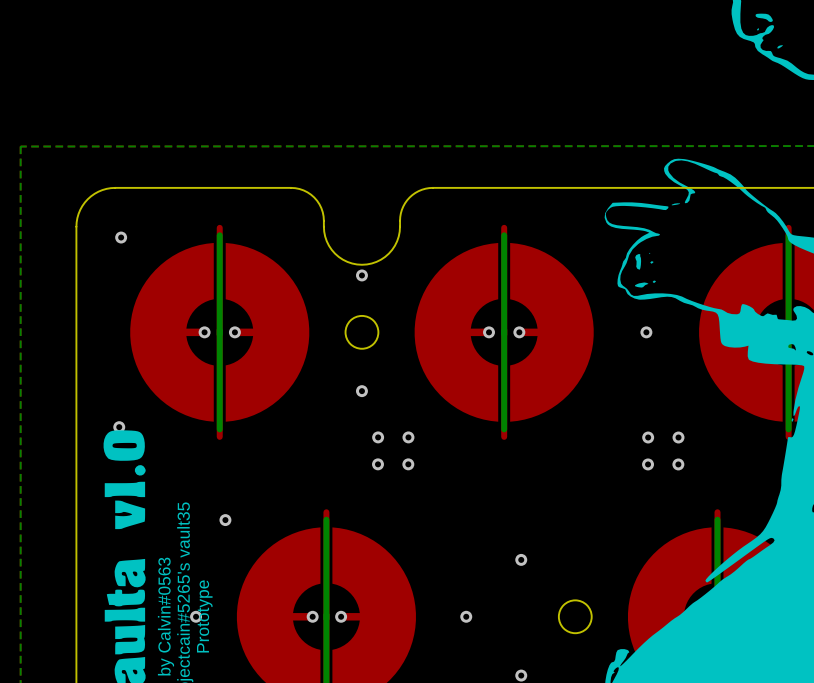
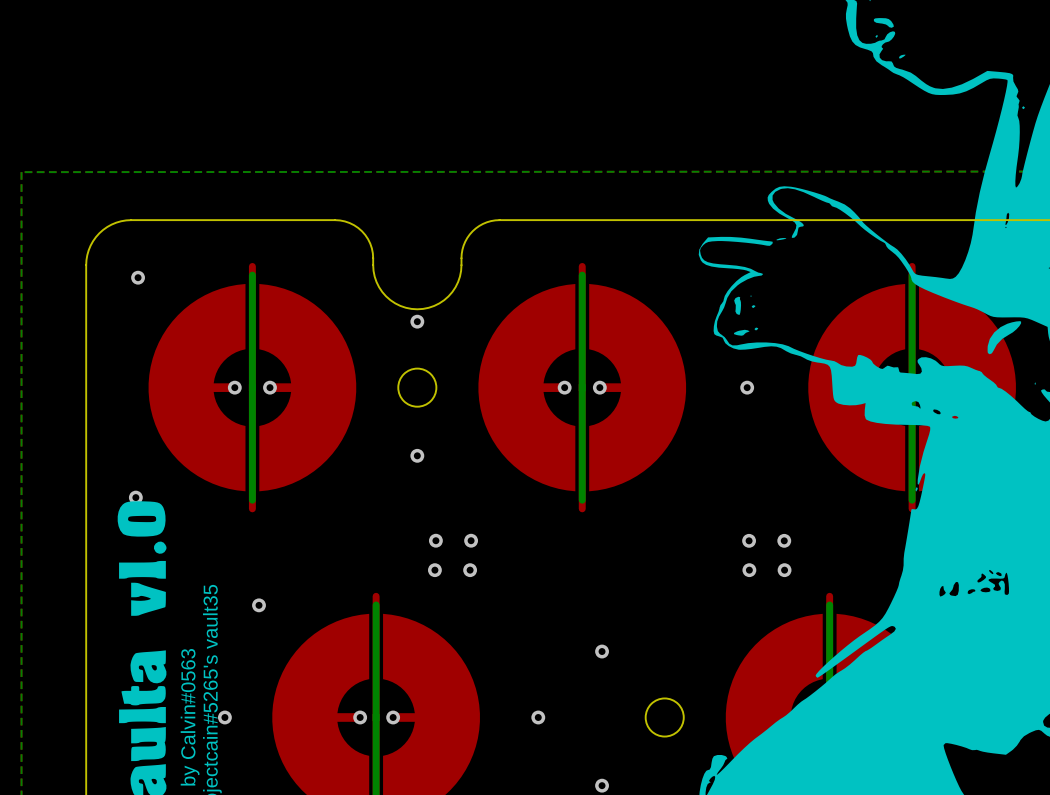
via: (378, 437) -> none
via: (408, 437) -> none
via: (648, 437) -> none
via: (678, 437) -> none
via: none -> (434, 570)
via: none -> (470, 570)
via: none -> (749, 570)
via: none -> (784, 570)
text: Prototype (204, 616) -> none

